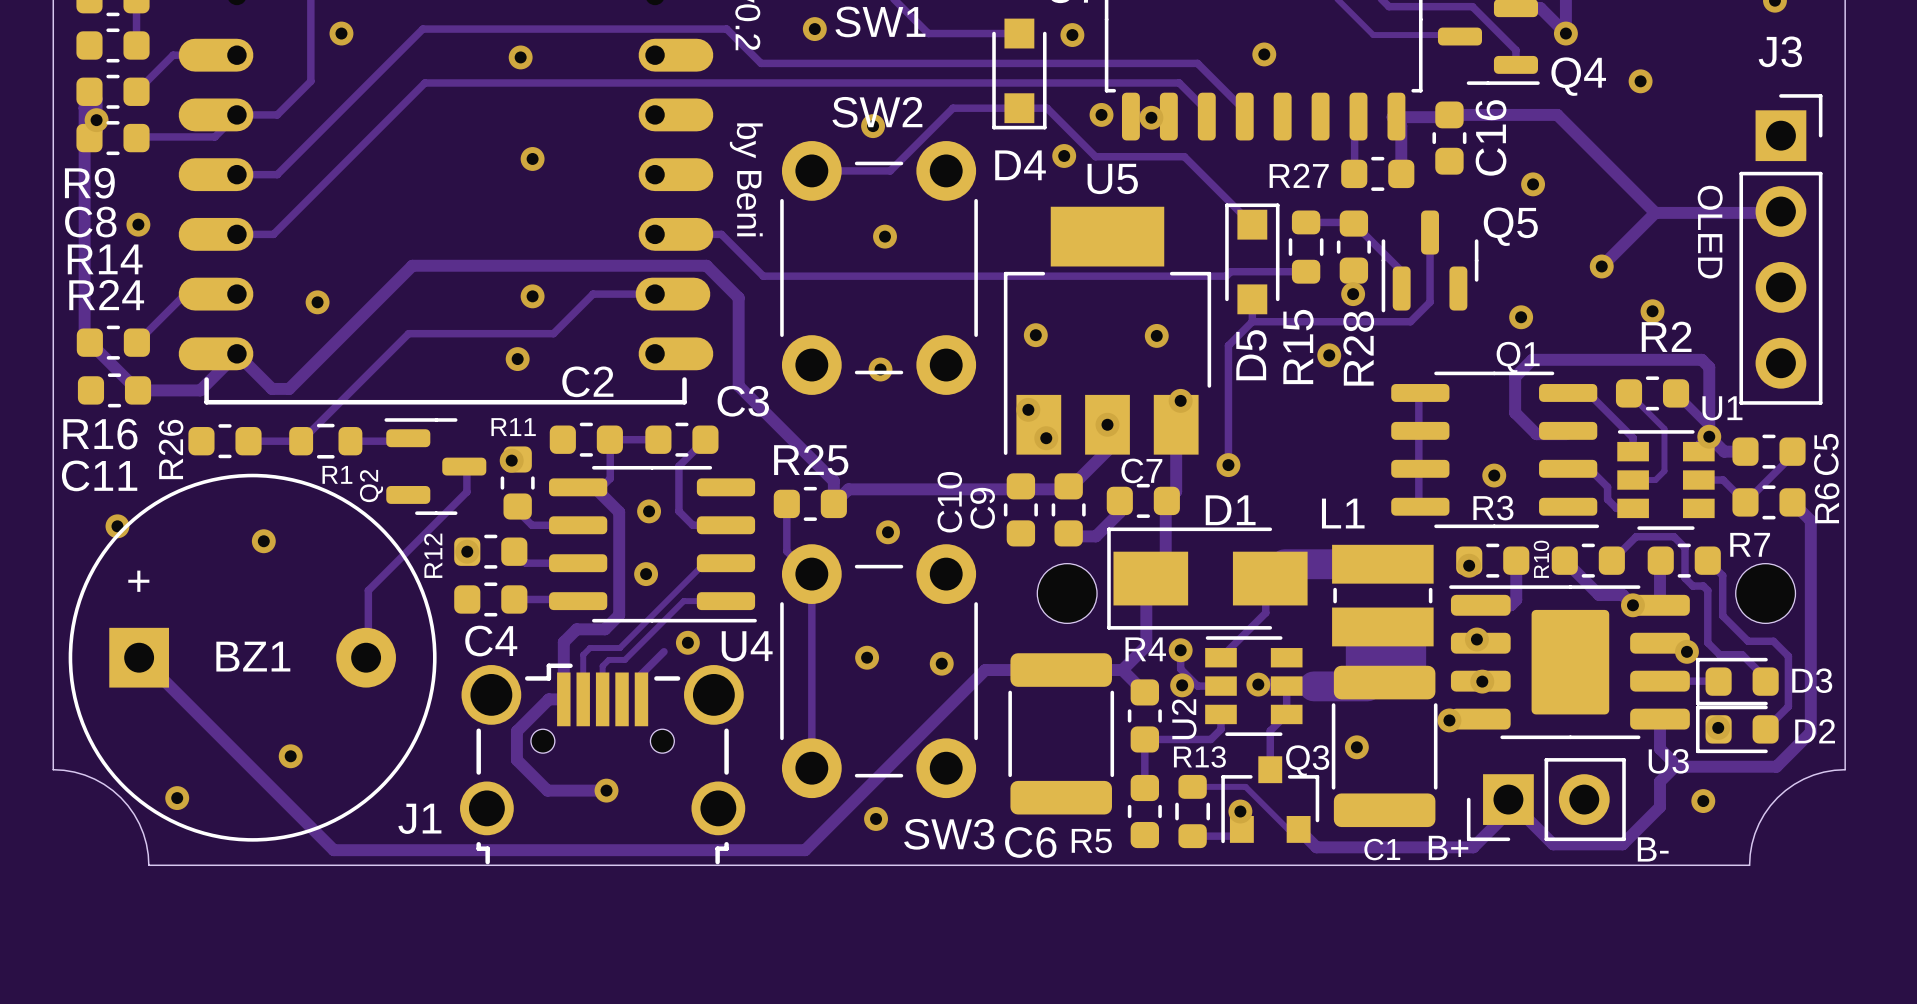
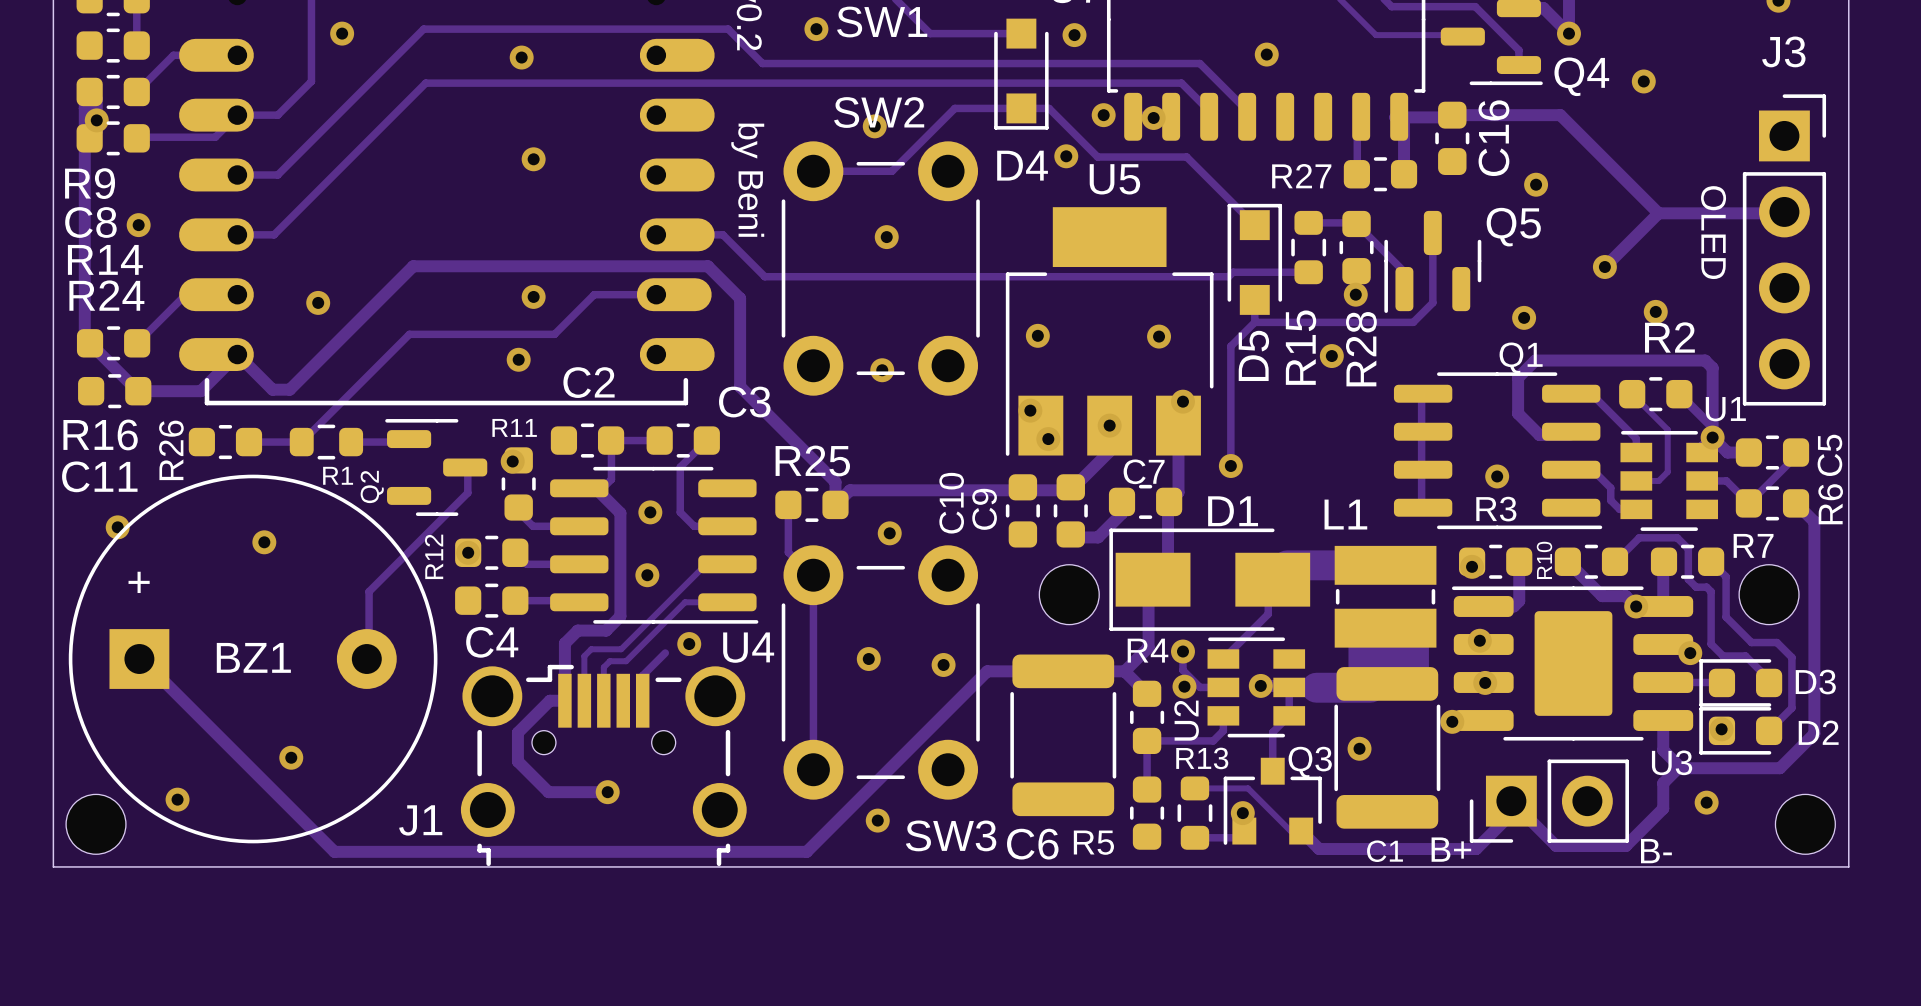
board edge: (53, 769) (84, 775) (104, 784) (120, 797) (134, 814) (143, 833) (148, 865) -> (53, 771) (53, 866) (149, 866)
board edge: (1845, 769) (1813, 775) (1794, 784) (1777, 797) (1759, 823) (1751, 844) (1749, 865) -> (1848, 771) (1848, 866) (1753, 866)
part: none -> (96, 824)
part: none -> (1805, 824)

